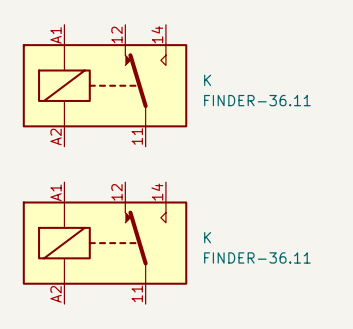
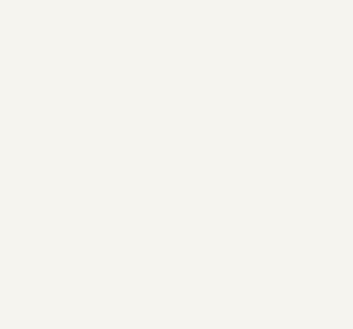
K: FINDER-36.11 (105, 85) -> none
K: FINDER-36.11 (105, 243) -> none

